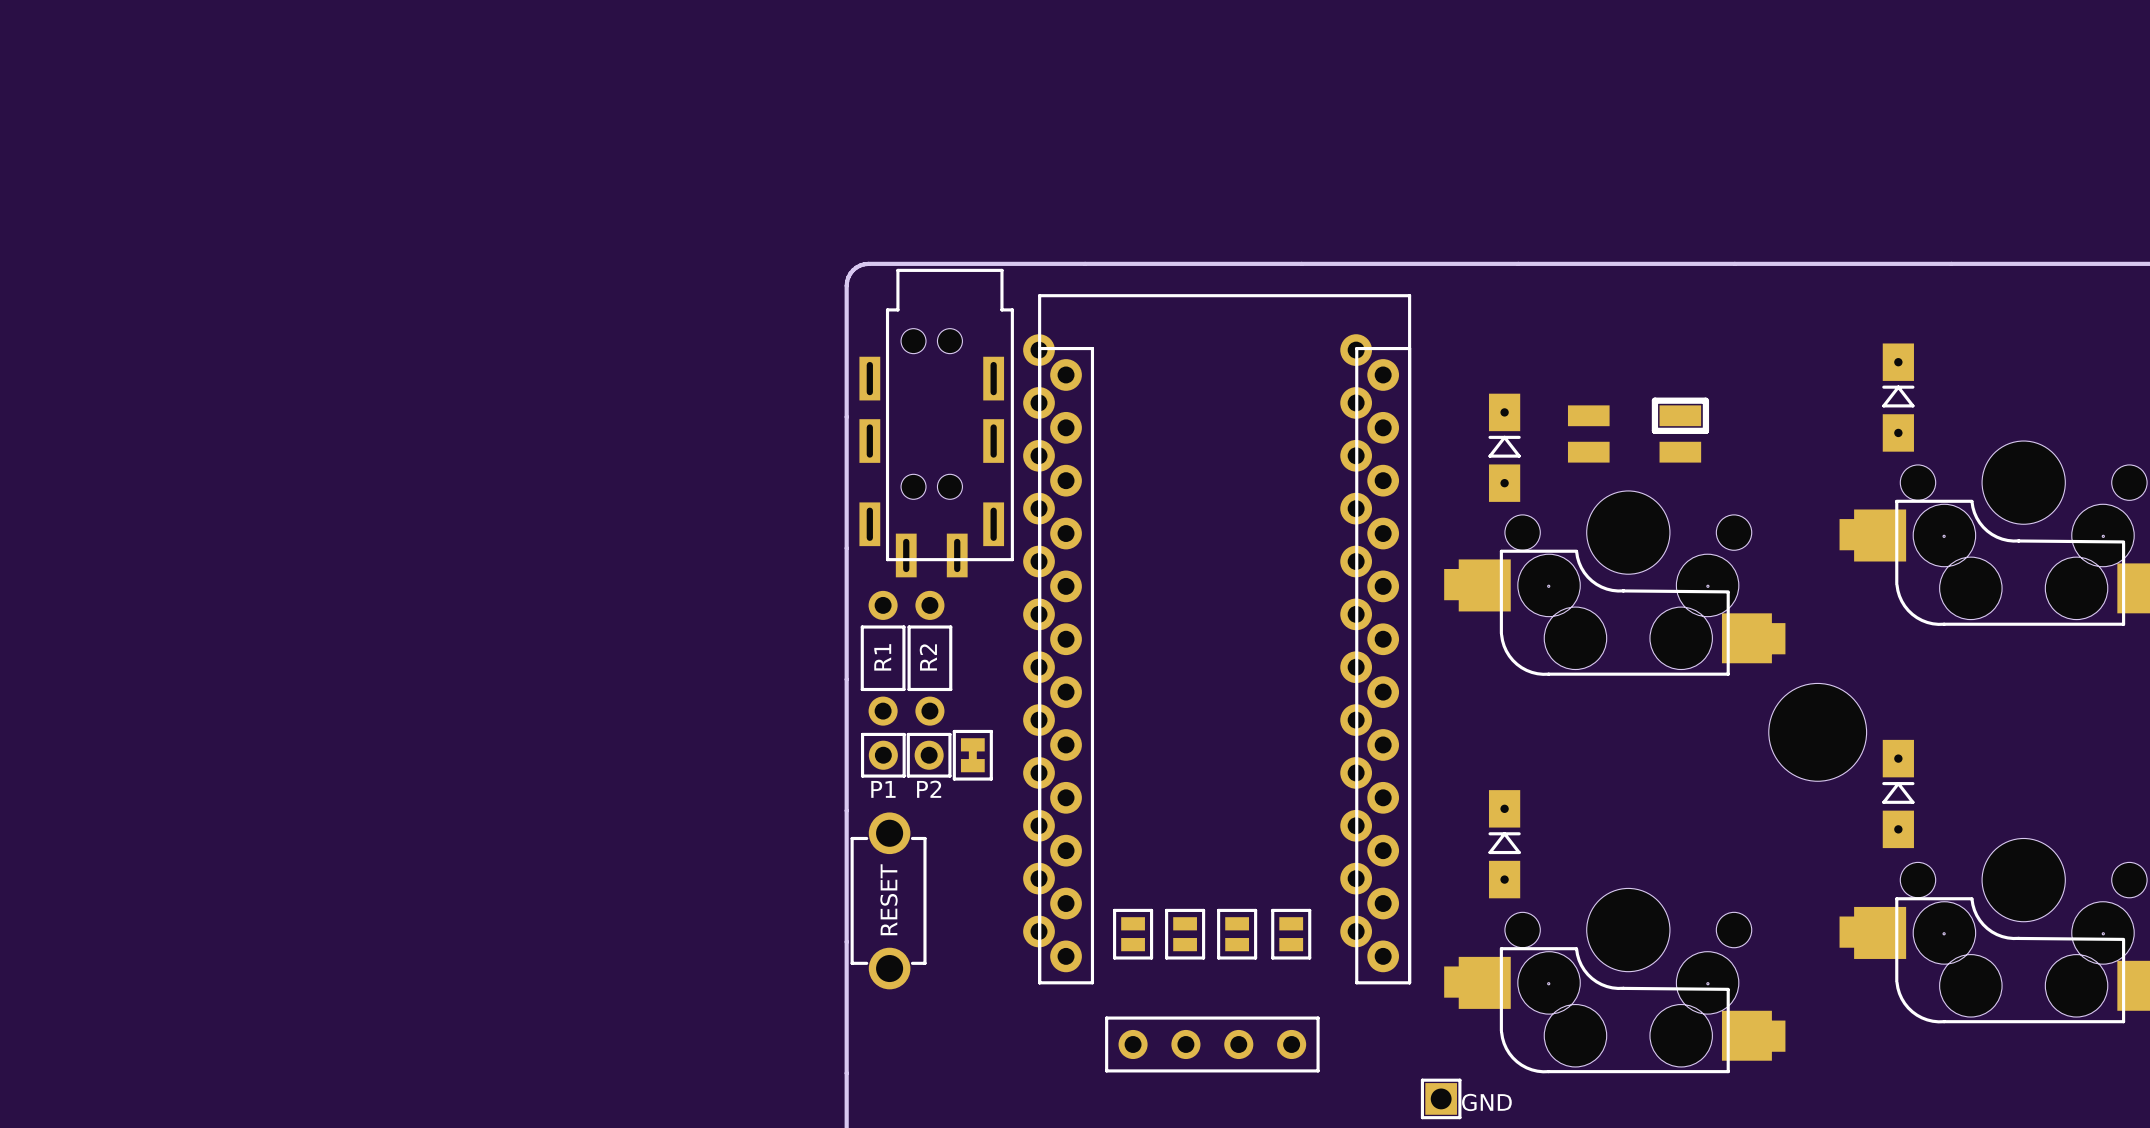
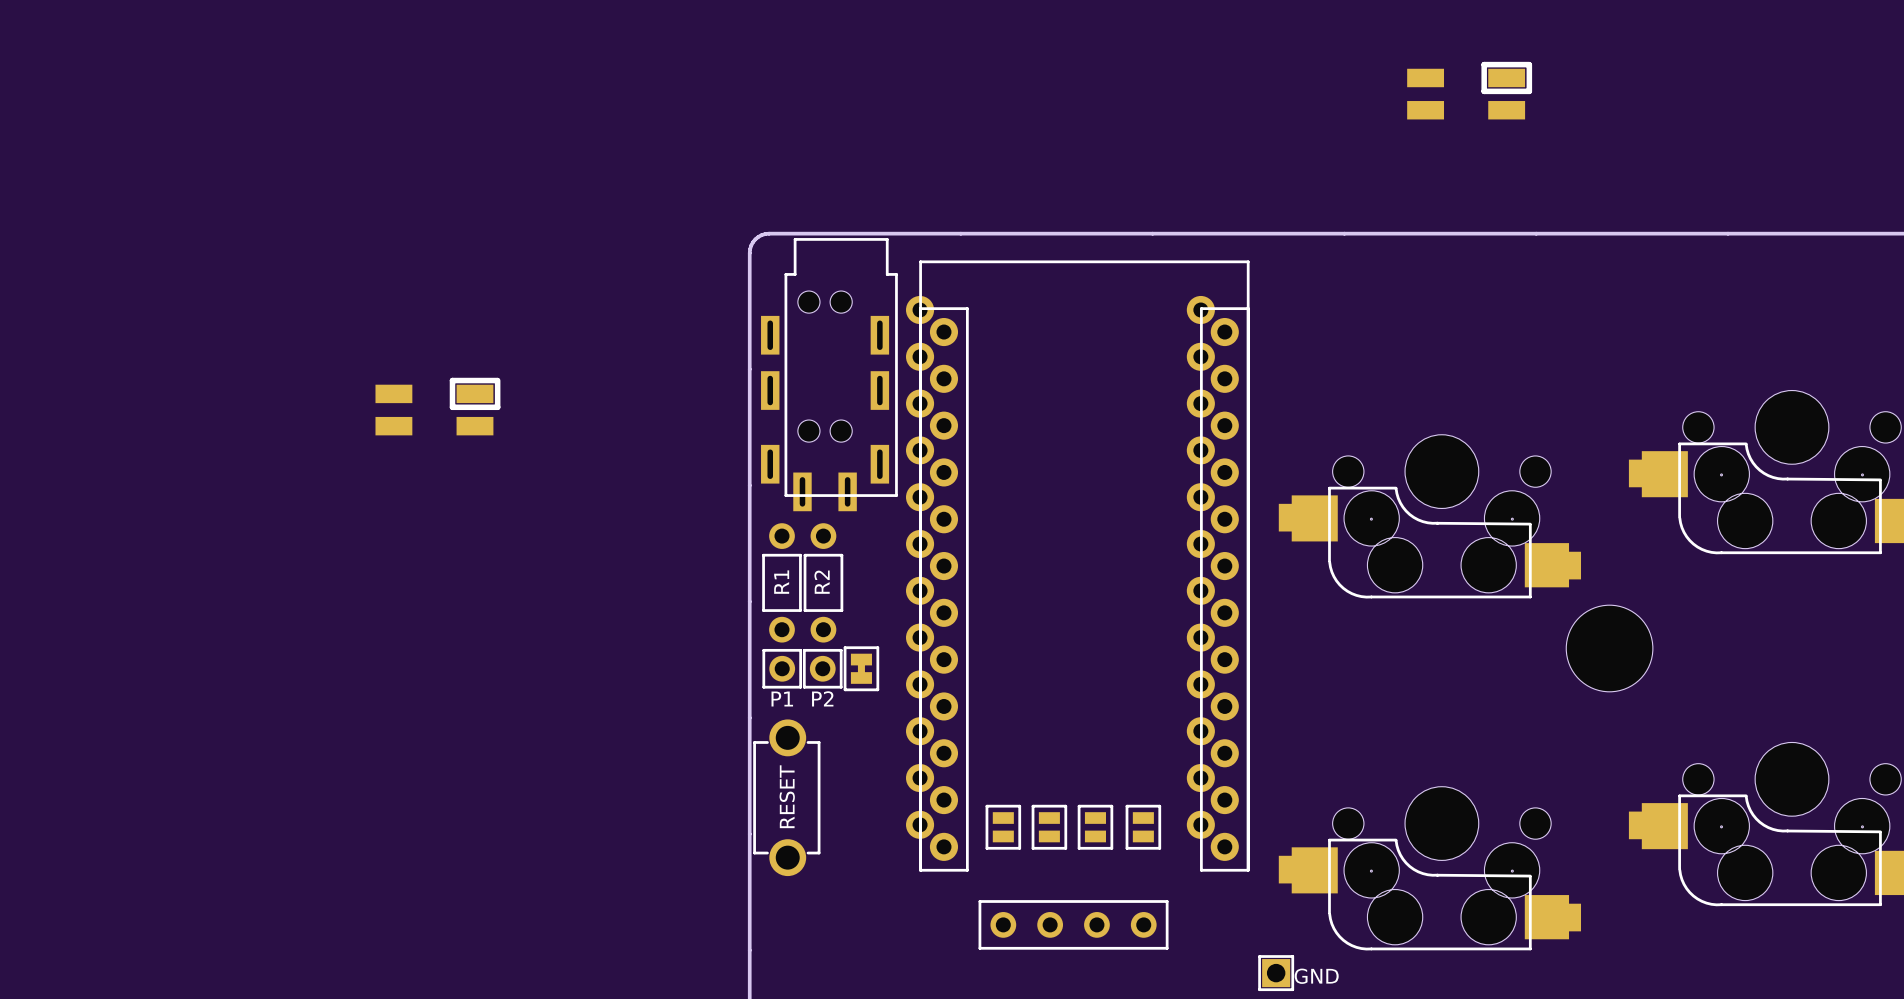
part: (1898, 397) -> none
part position: (1638, 430) -> (1469, 90)
part: (1504, 447) -> none
part: none -> (437, 406)
part: (1898, 793) -> none
part: (1504, 844) -> none

